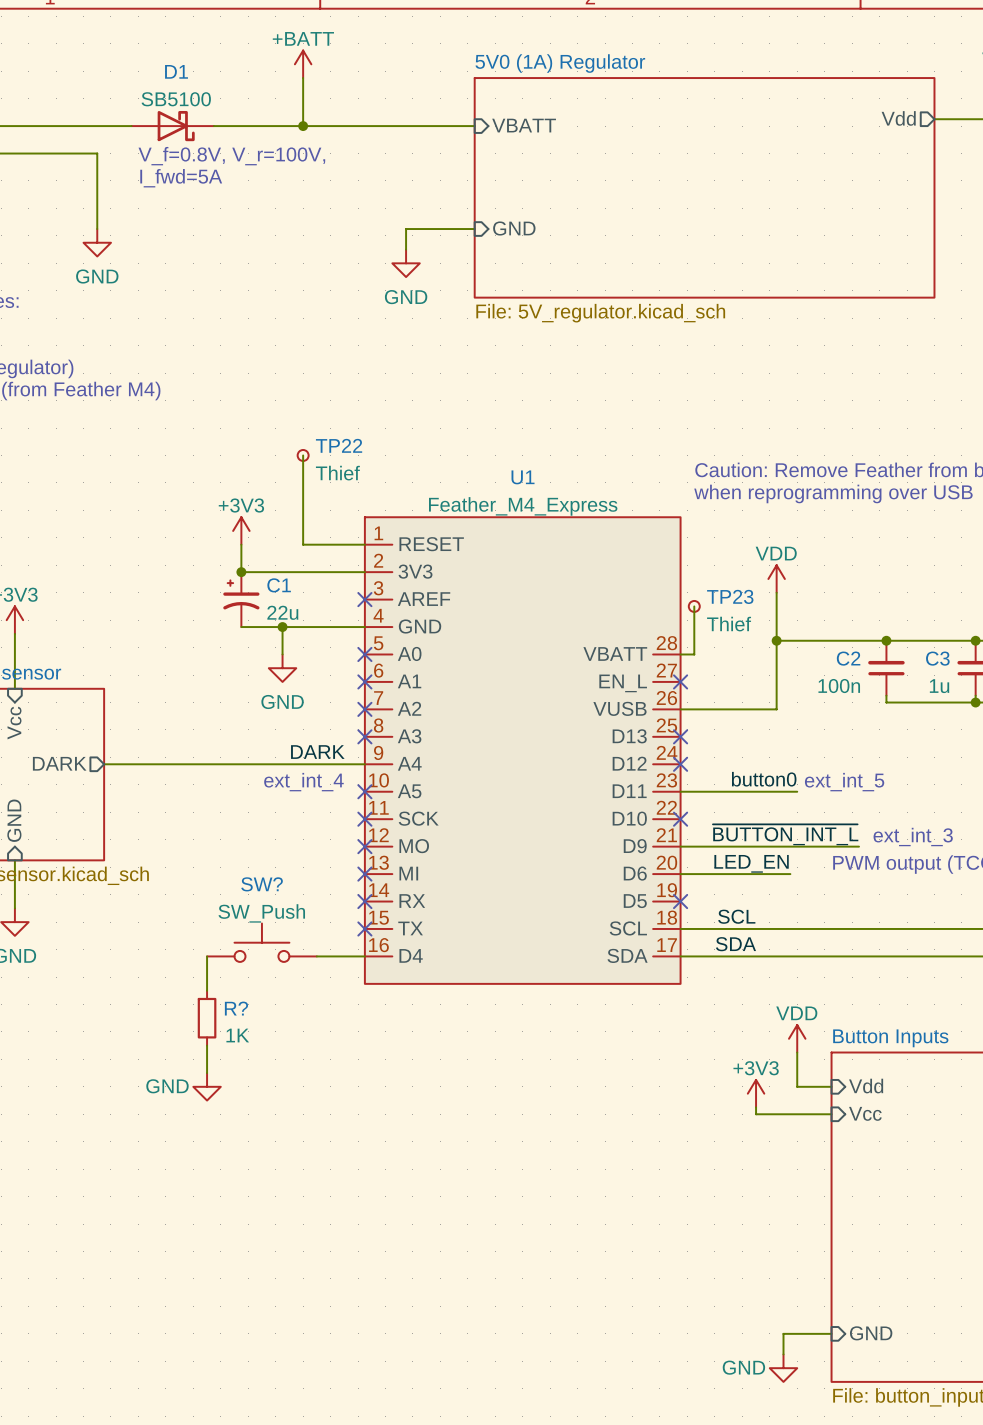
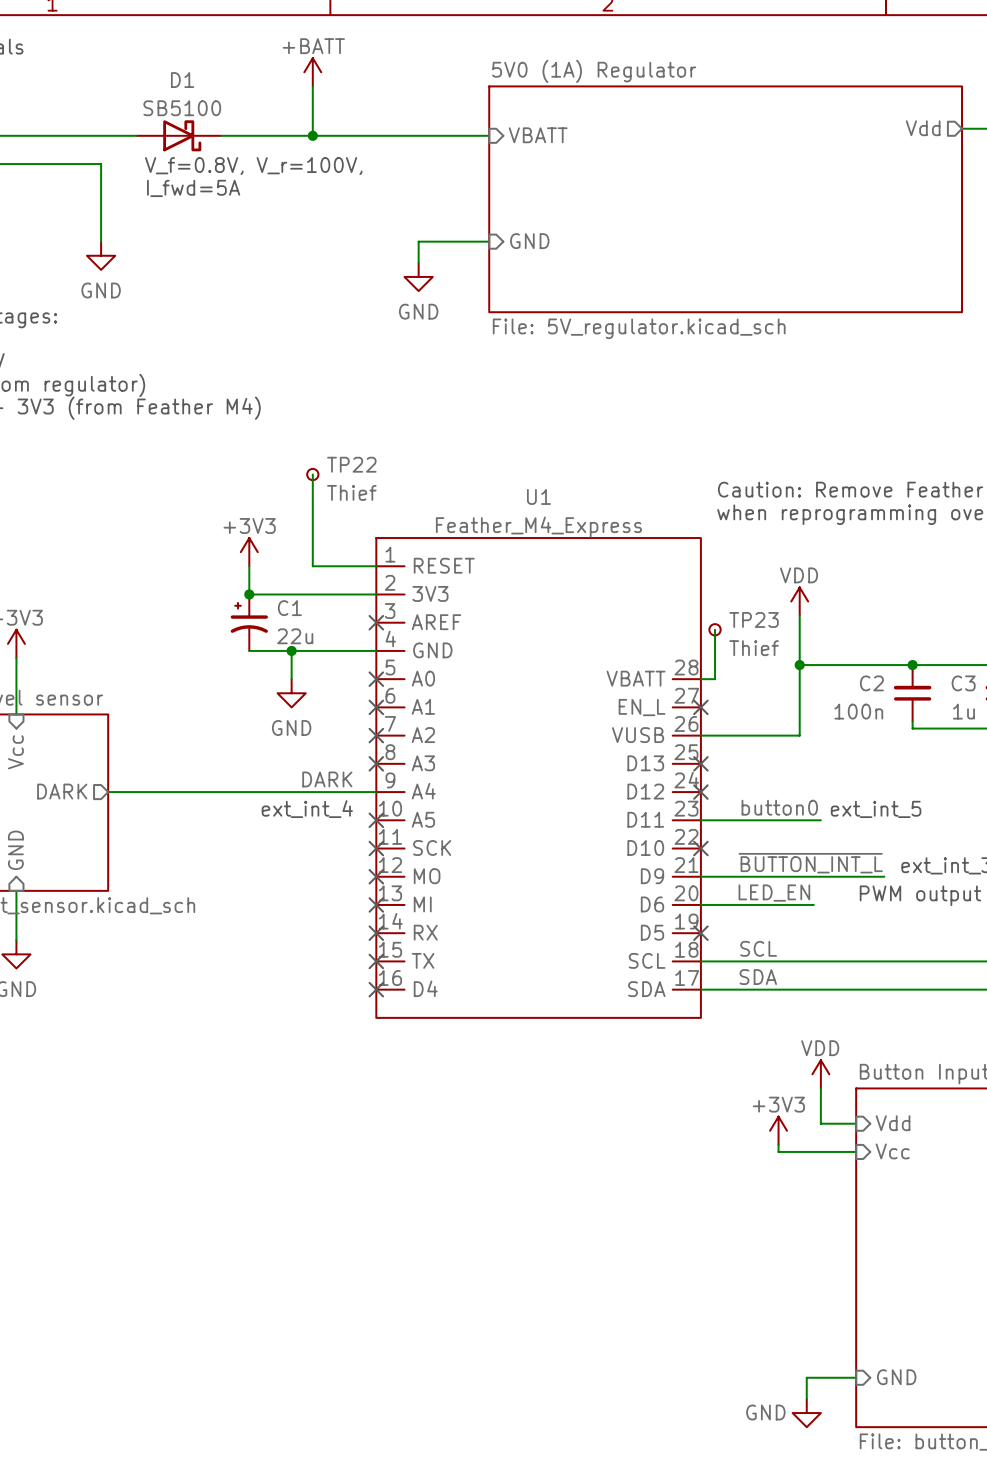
SW?: SW_Push (261, 942) -> none
wire: (207, 956) (207, 990) -> none
wire: (316, 956) (364, 956) -> none
no-connect mark: none -> (376, 989)
R?: 1K (207, 1018) -> none
wire: (207, 1045) (207, 1073) -> none
power symbol: GND (207, 1086) -> none

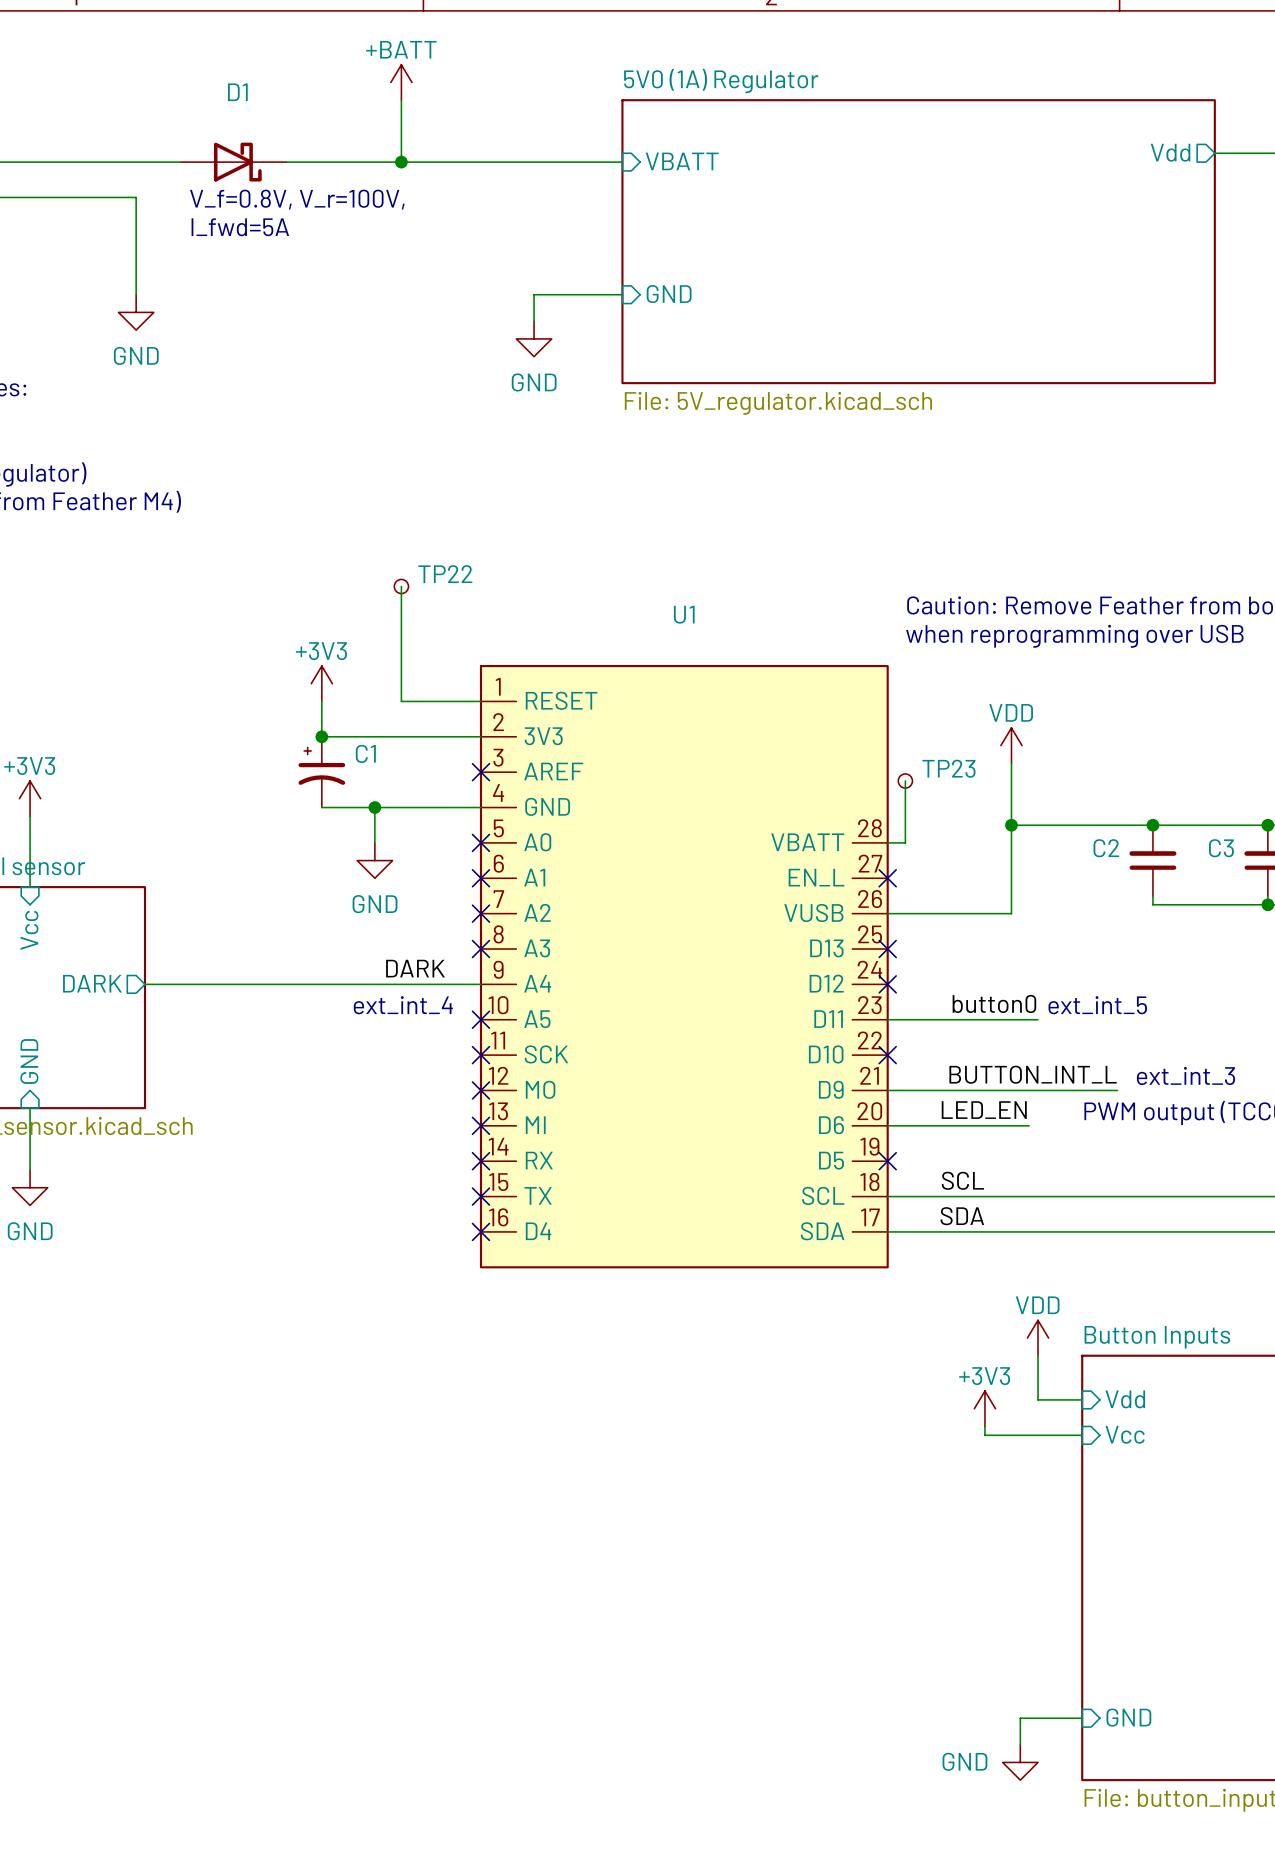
D1 value: SB5100 (182, 108) -> none
TP22 value: Thief (351, 492) -> none
U1 value: Feather_M4_Express (538, 527) -> none
C1 value: 22u (295, 636) -> none
TP23 value: Thief (754, 648) -> none
C2 value: 100n (858, 711) -> none
C3 value: 1u (963, 711) -> none
label: ~{BUTTON_INT_L} (810, 863) -> BUTTON_INT_L (1033, 1074)

